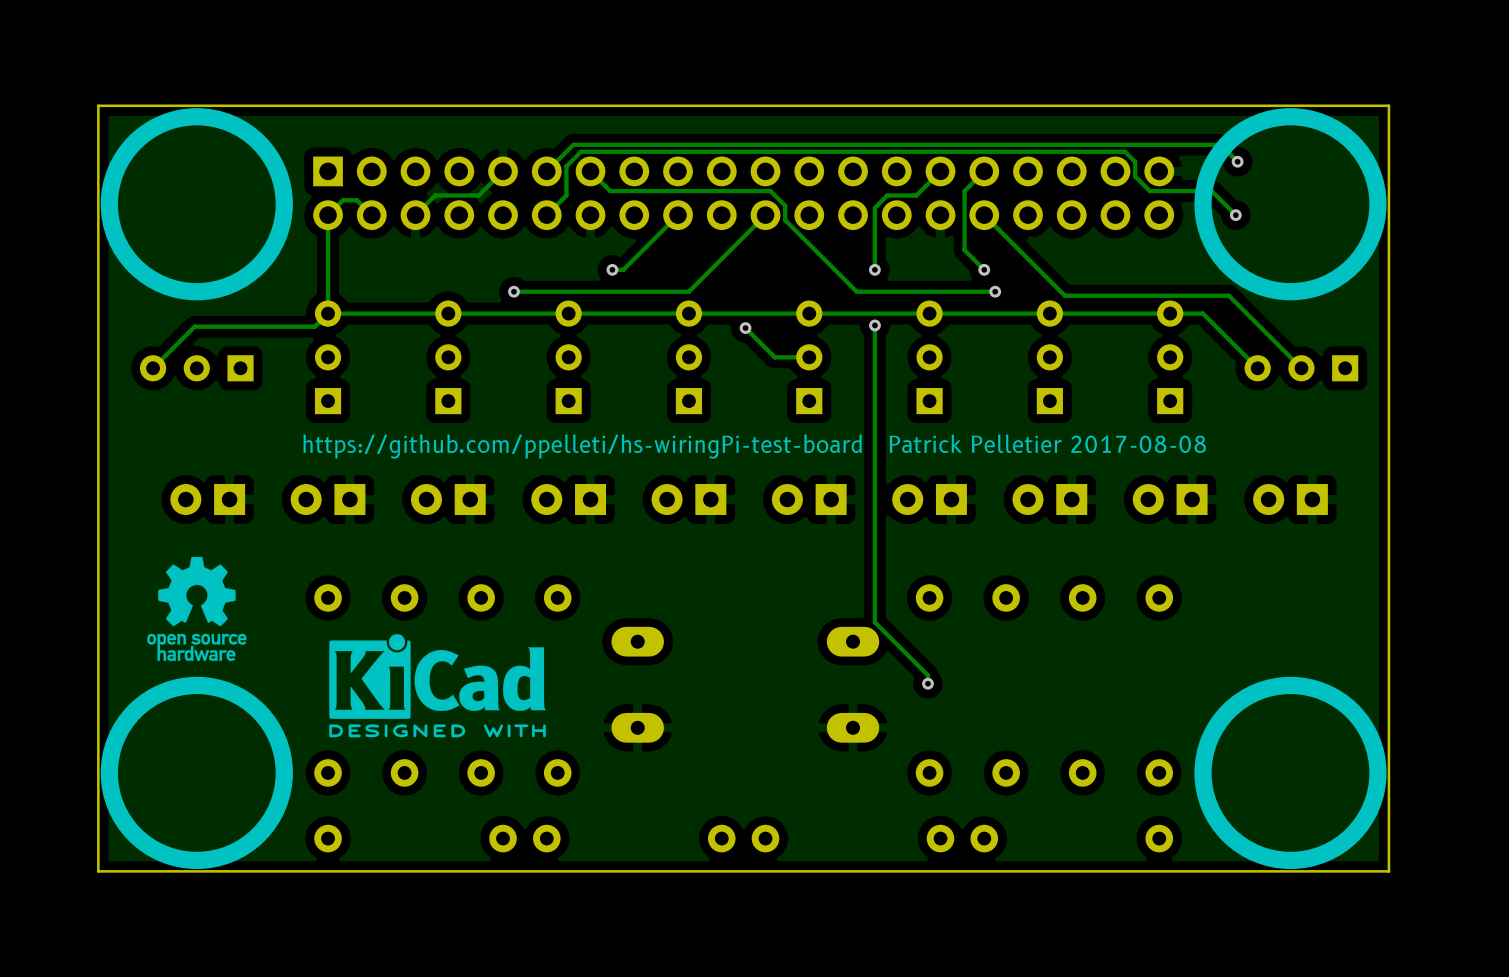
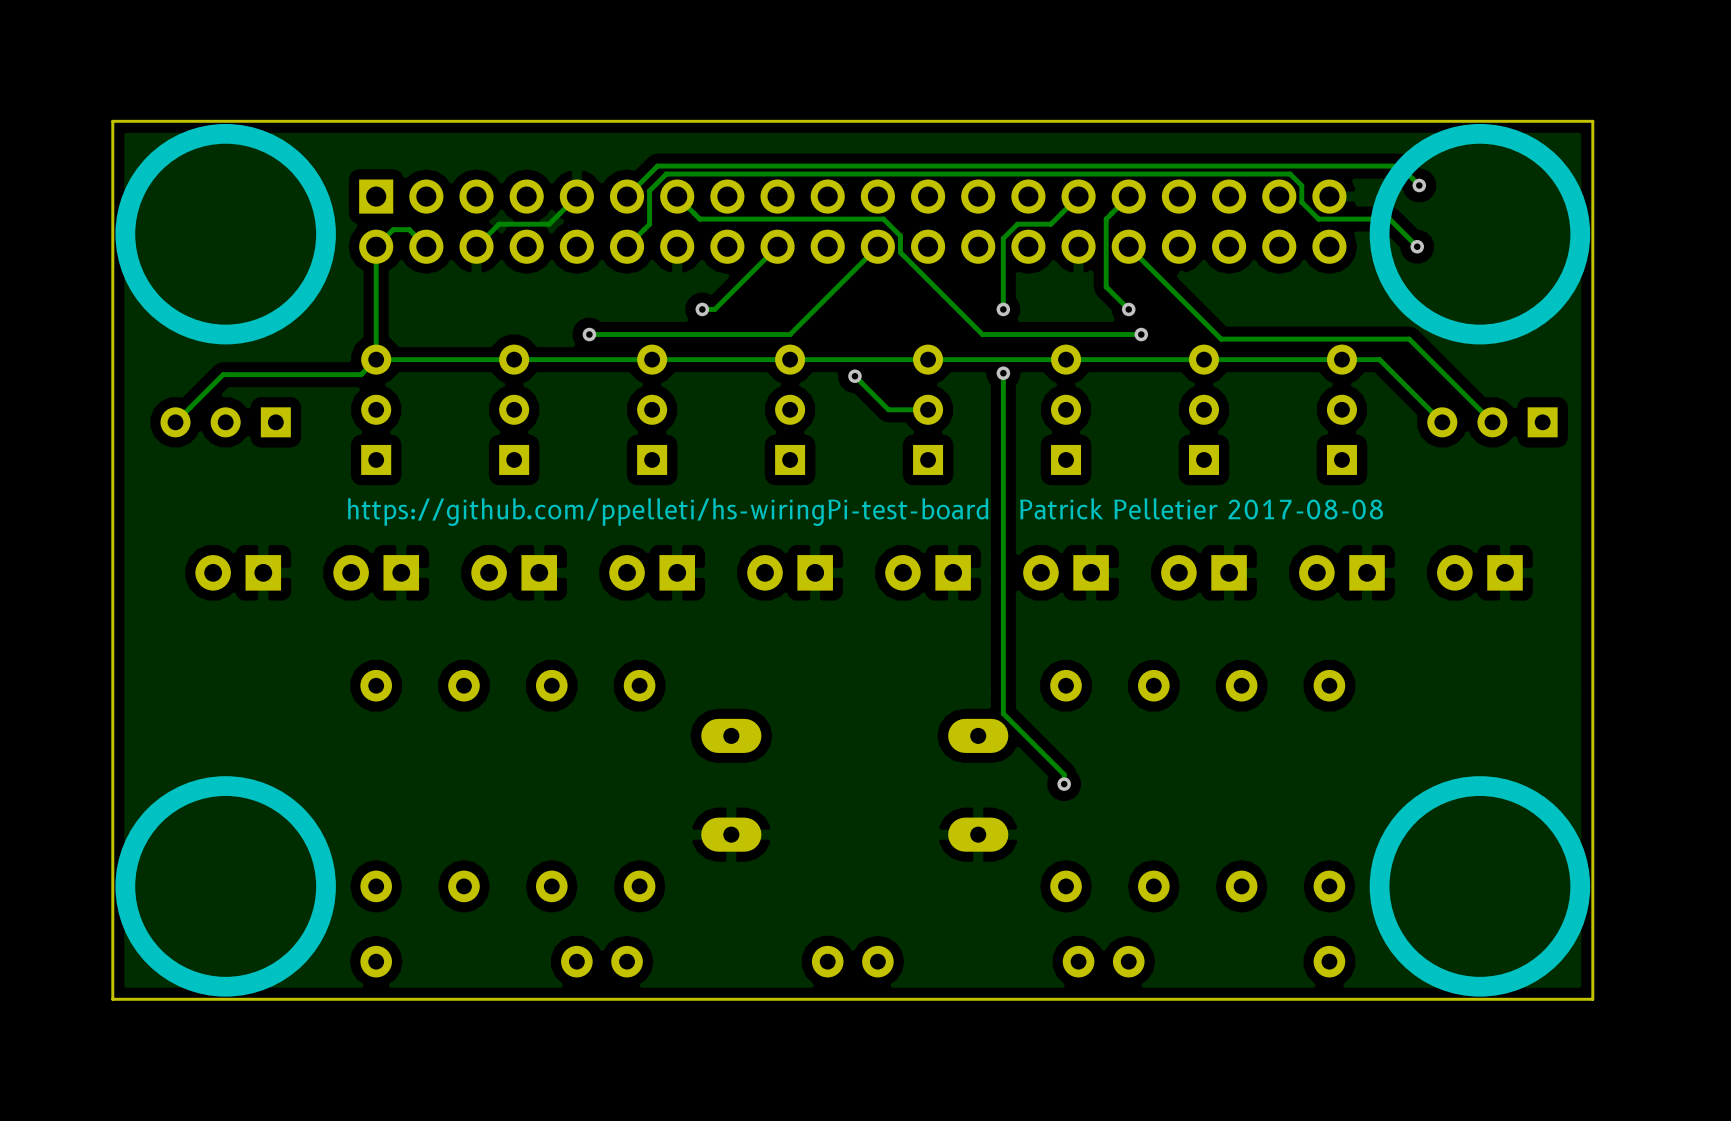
drawing: [147, 556, 247, 661] -> none
drawing: [329, 634, 546, 738] -> none

